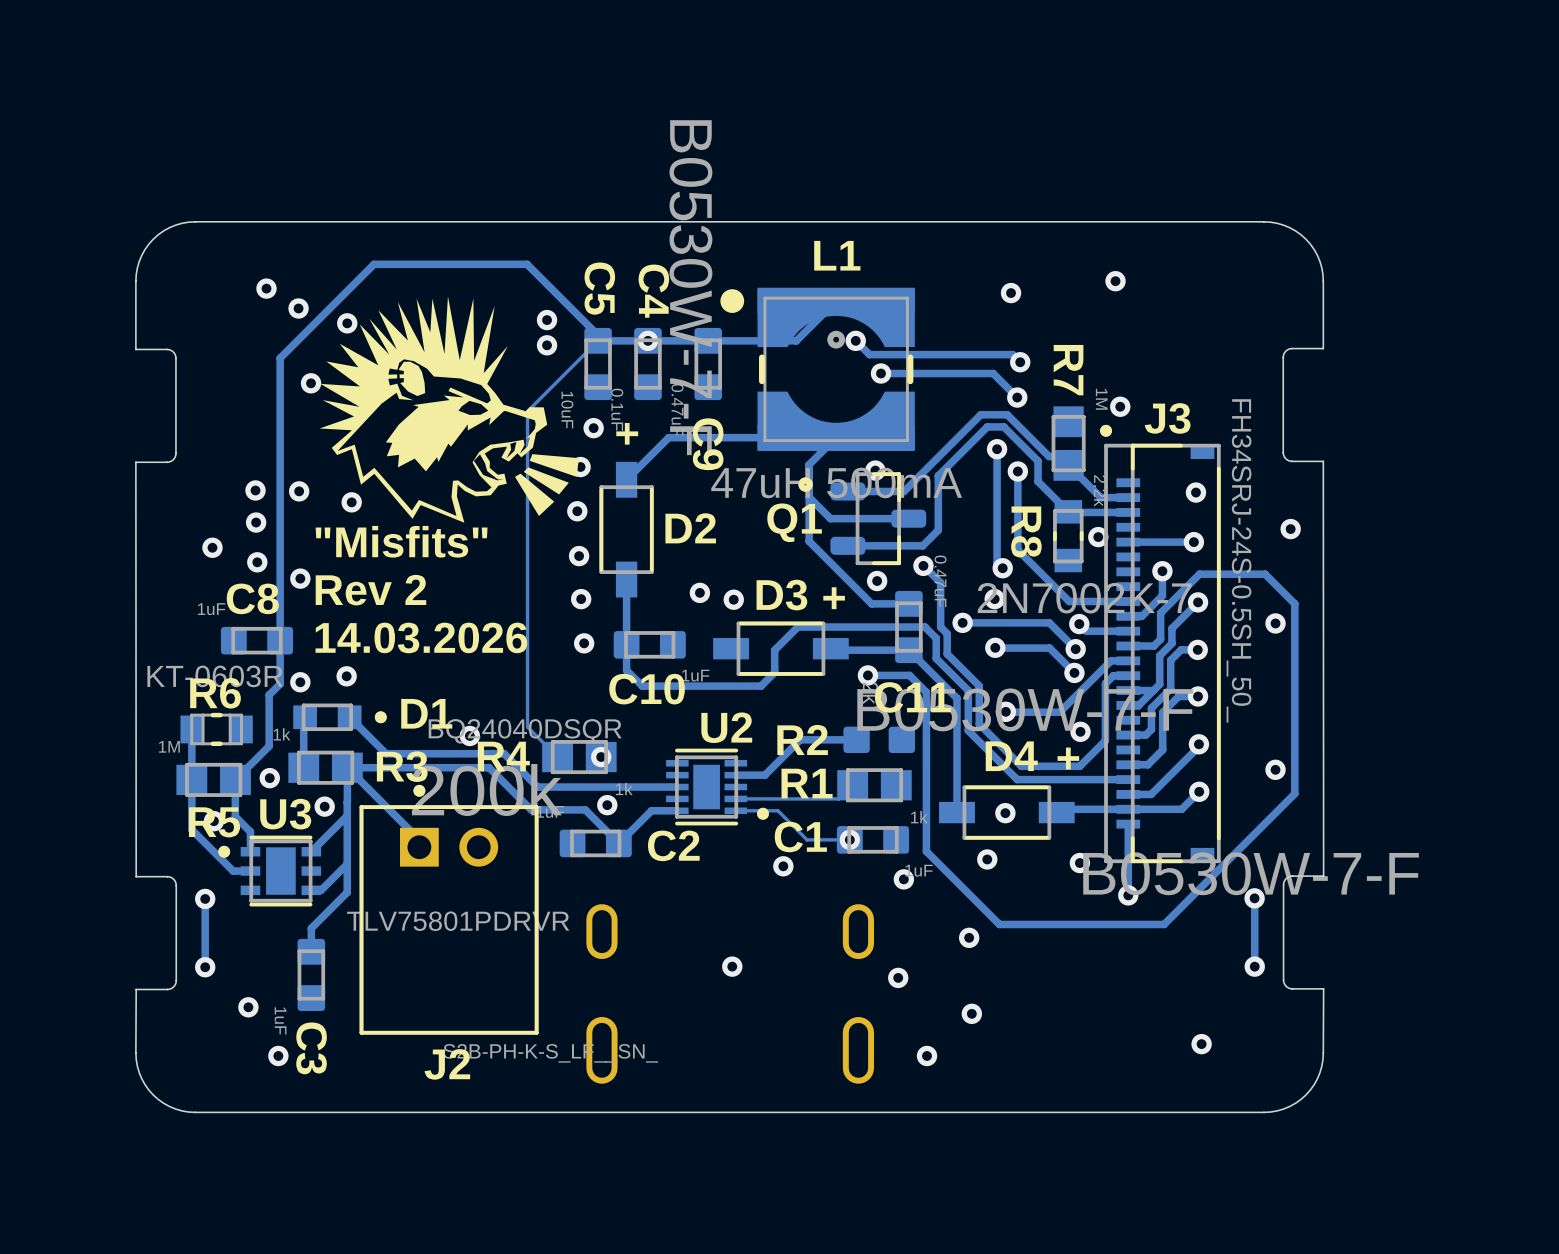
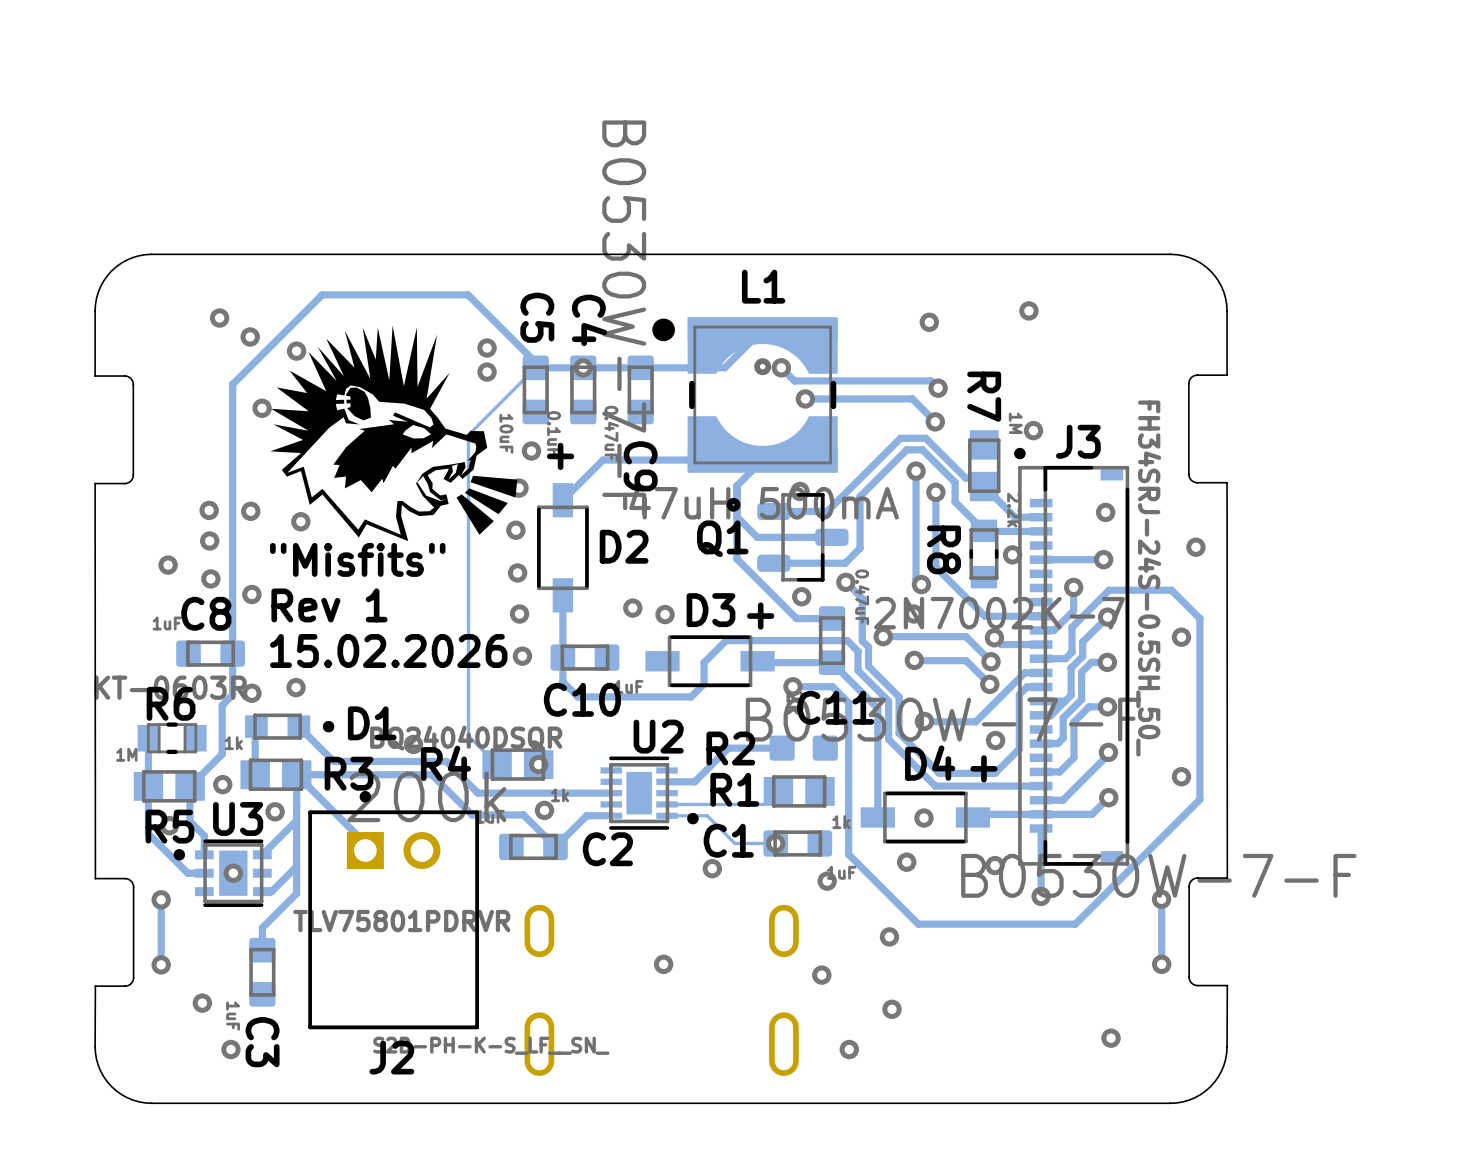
text: Rev 2 (370, 590) -> Rev 1 (329, 605)
text: 14.03.2026 (421, 637) -> 15.02.2026 (388, 651)
via: none -> (233, 873)

